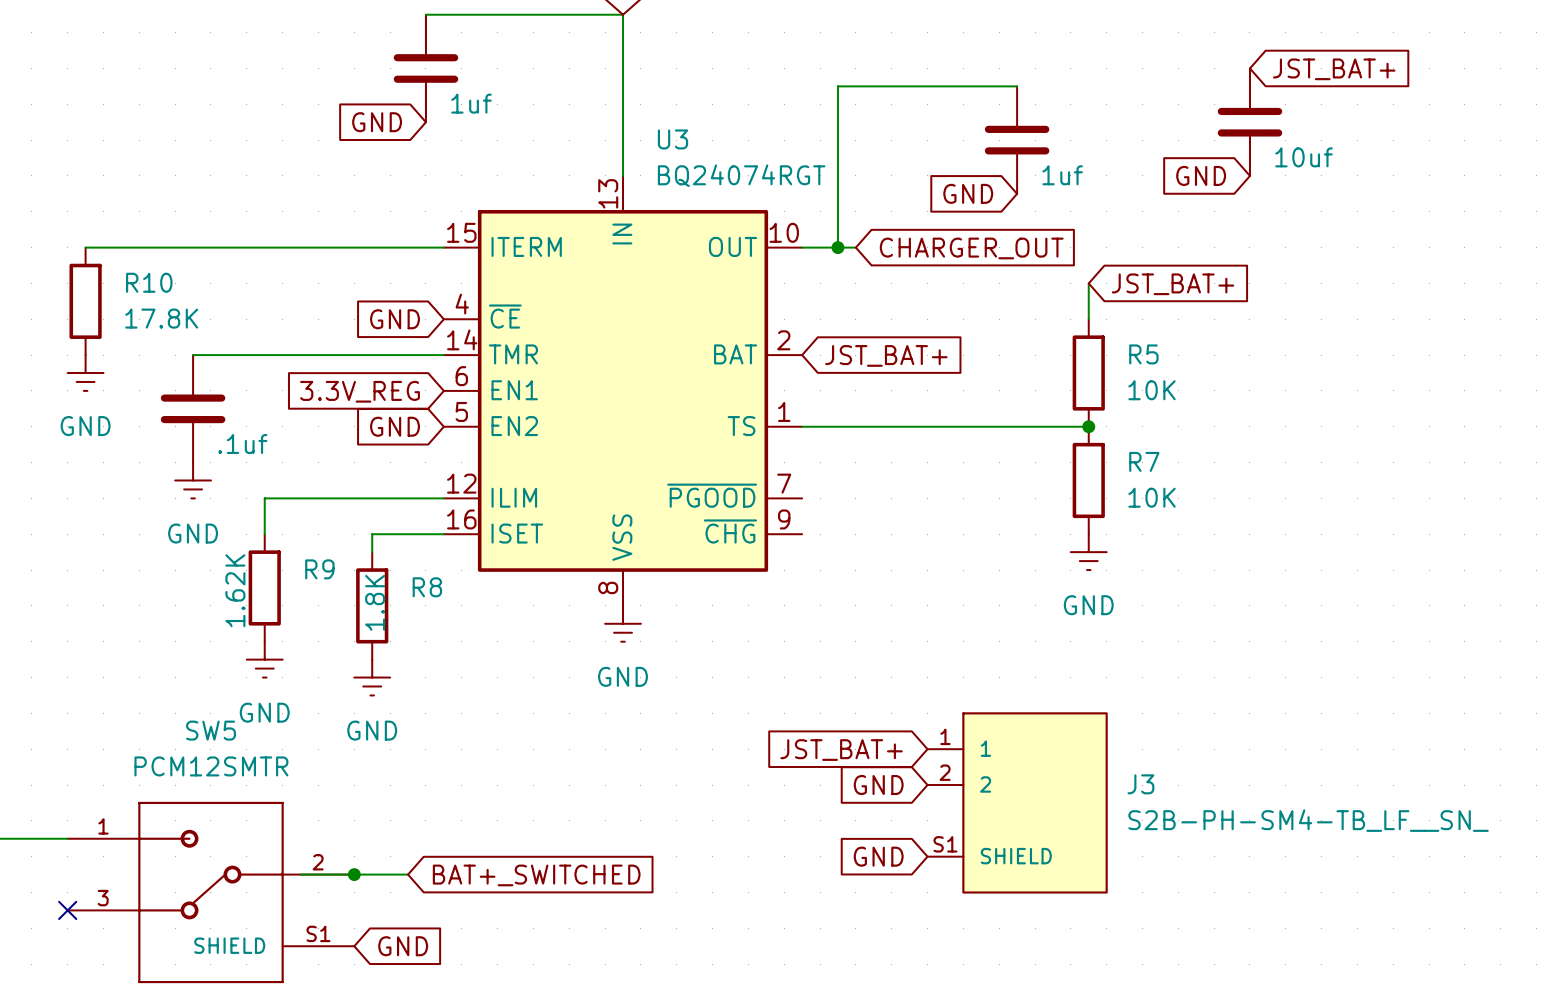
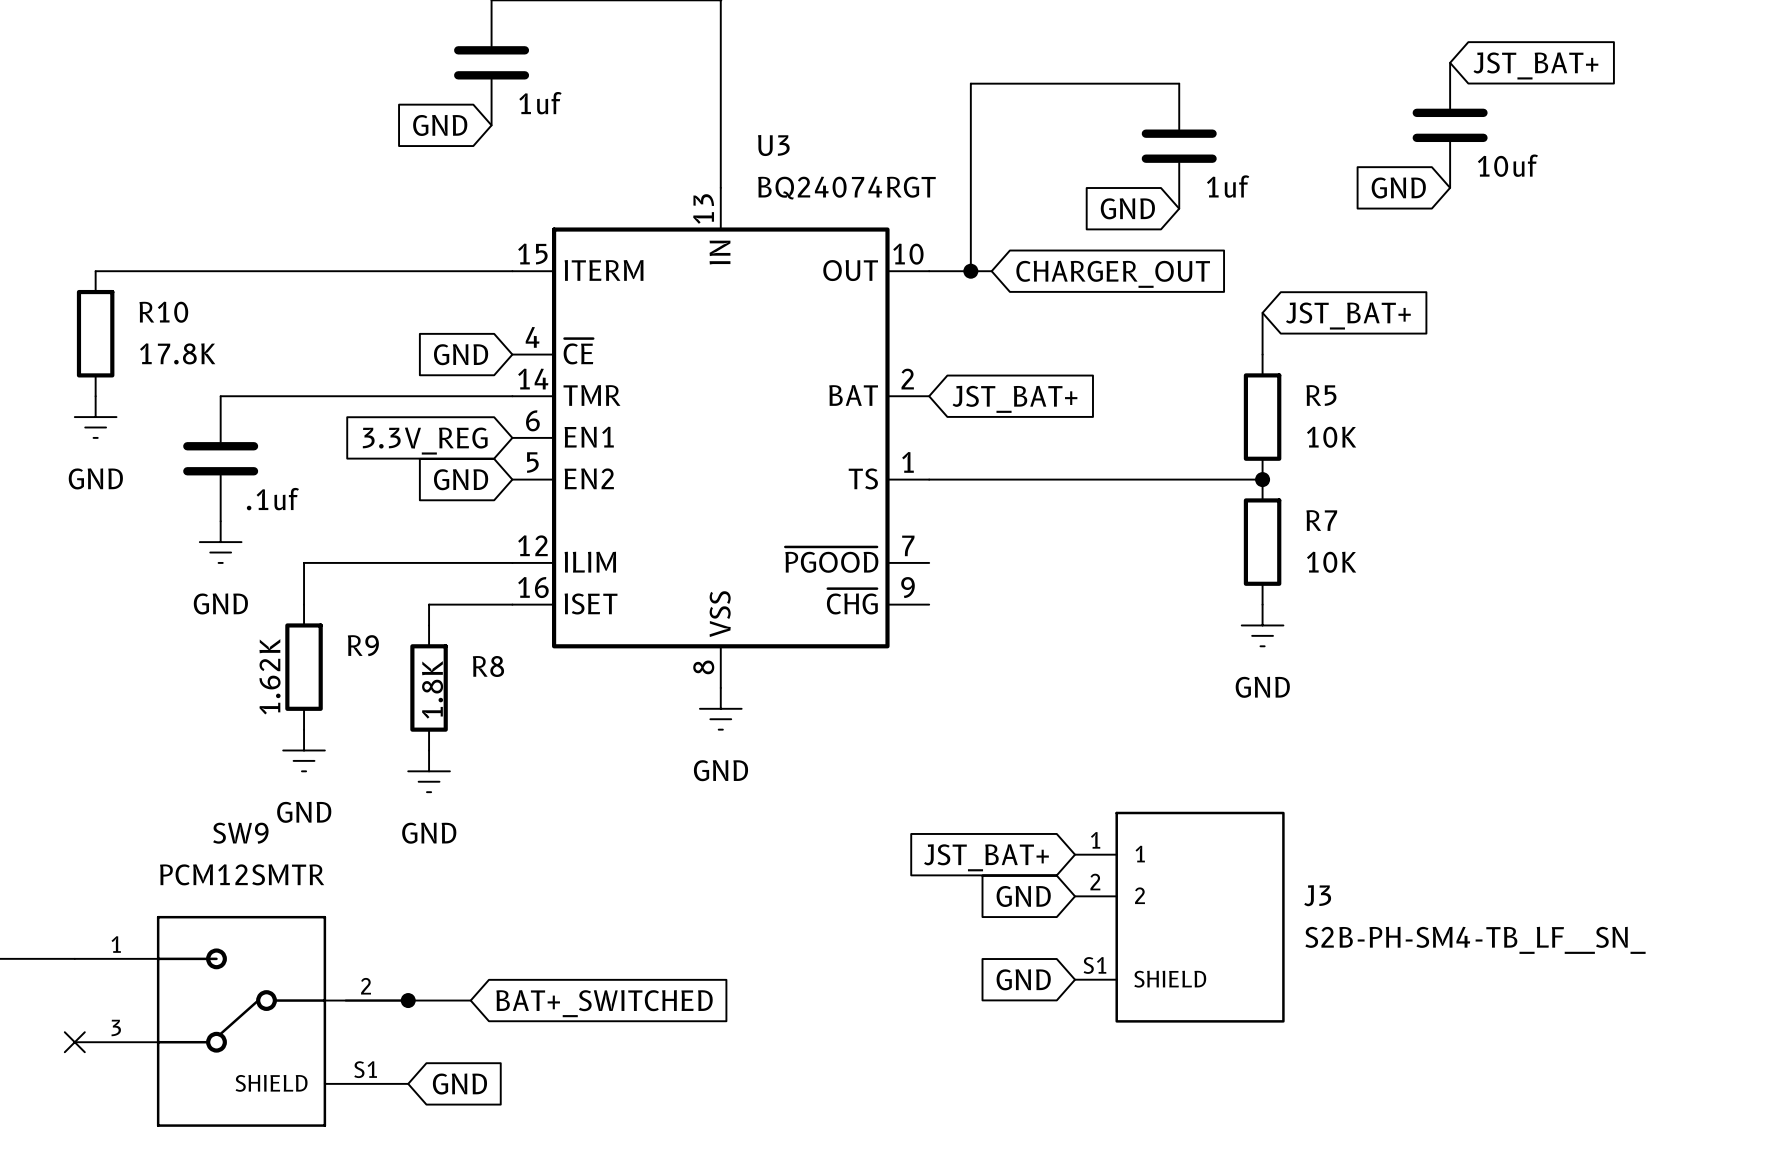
SW5 name: SW5 (210, 730) -> SW9 (240, 833)

